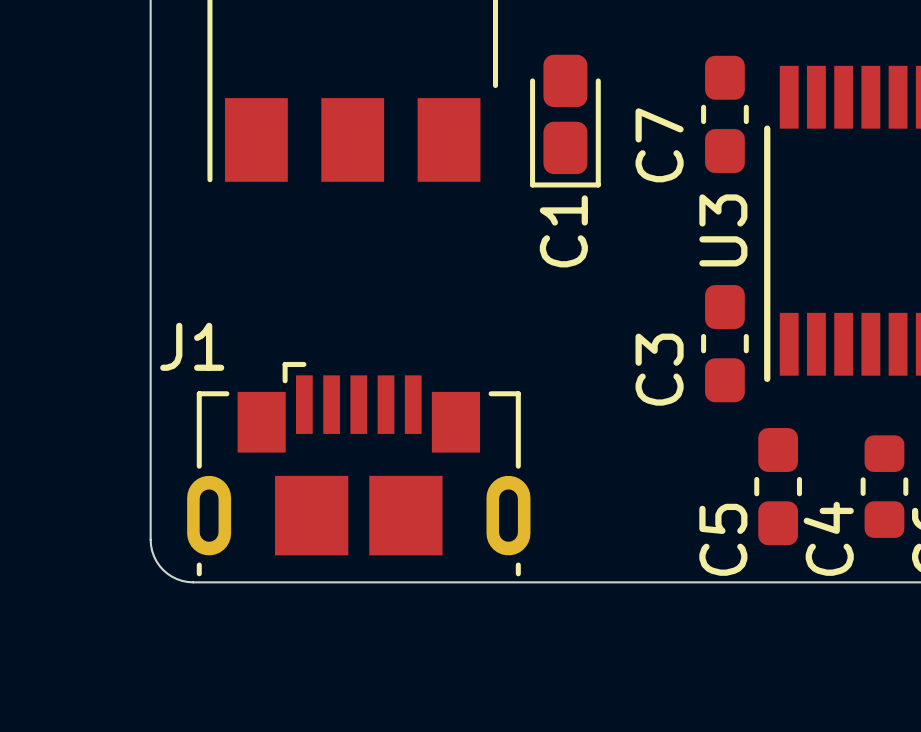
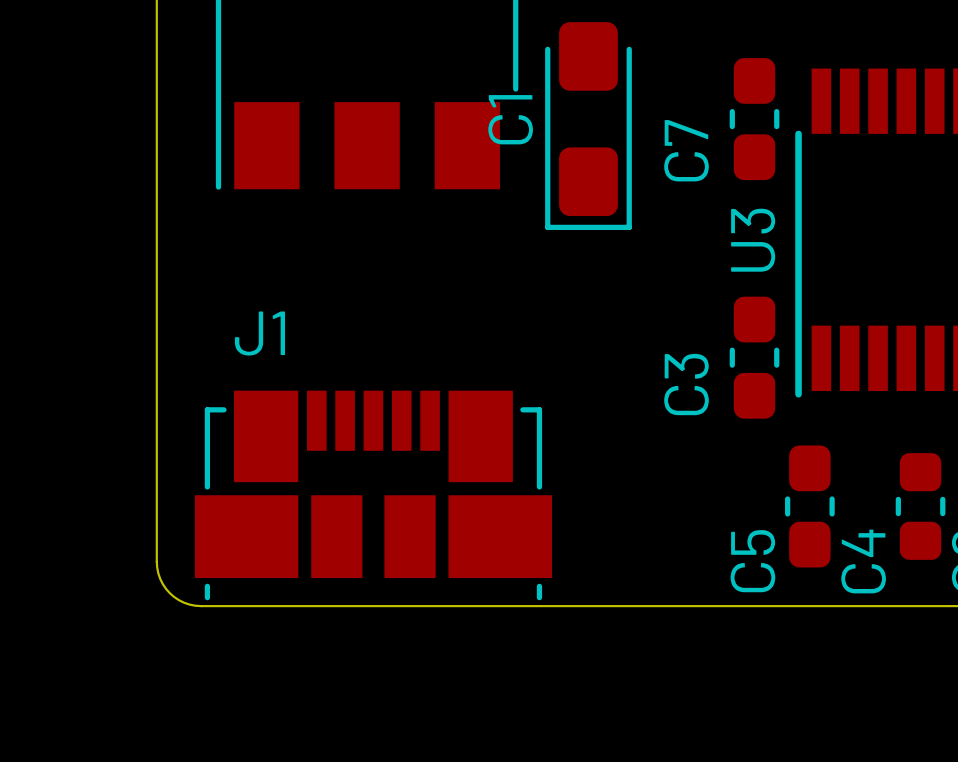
C1 footprint: [530, 54, 601, 188] -> [545, 22, 632, 230]
C1 name position: C1 (563, 231) -> C1 (510, 119)
J1 footprint: [187, 361, 531, 577] -> [194, 390, 552, 601]

